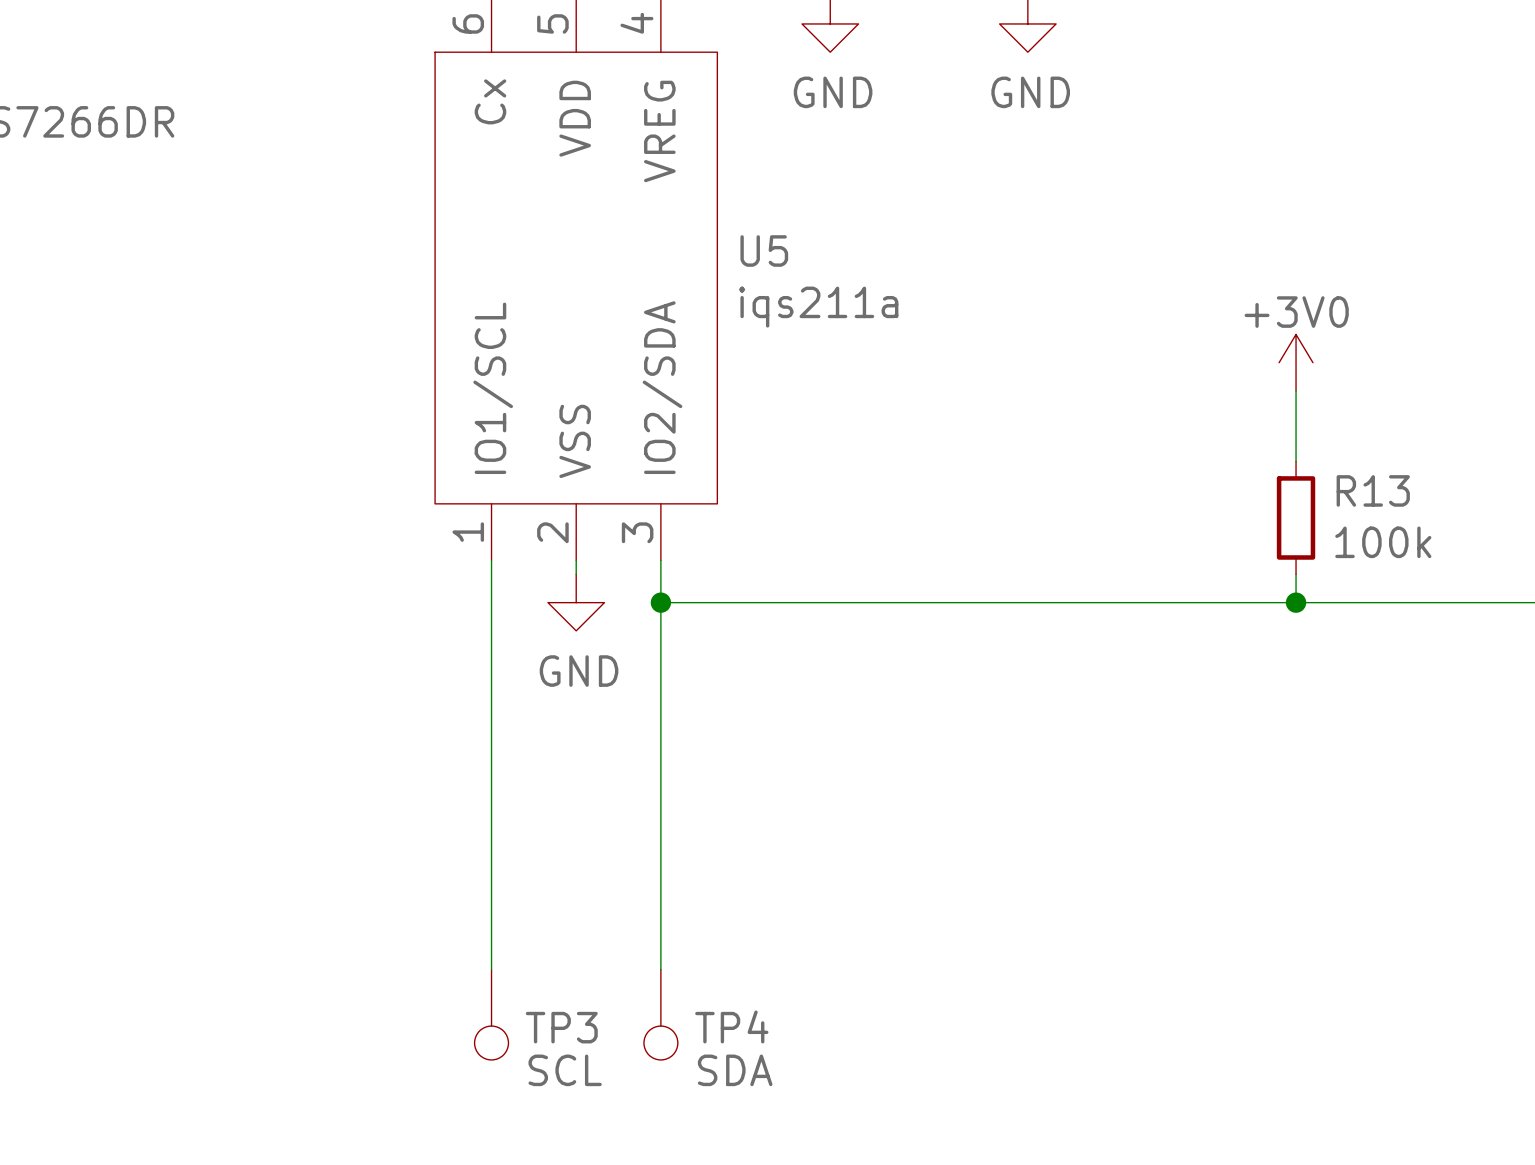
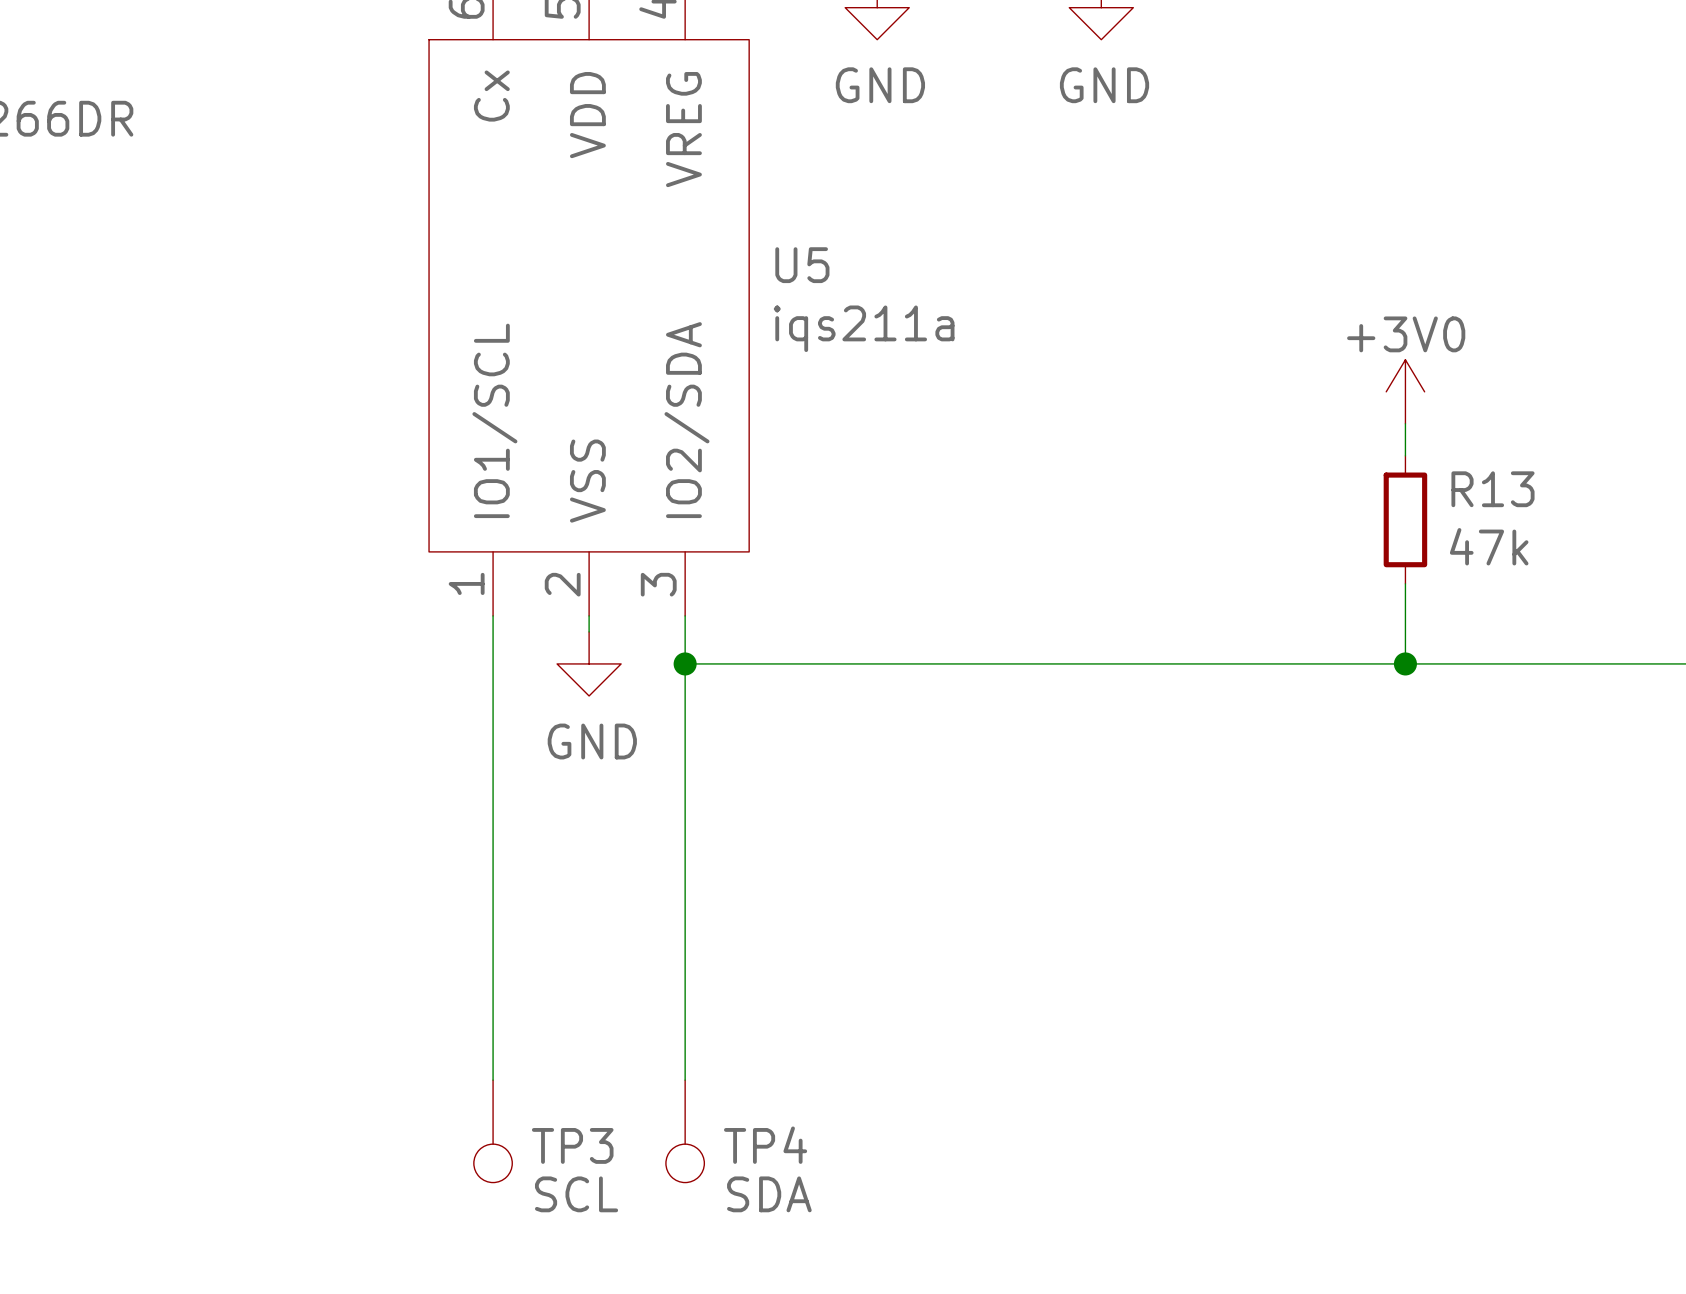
wire: (1296, 419) (1296, 461) -> (1405, 583) (1405, 631)
R13 position: (1296, 517) -> (1405, 519)
R13 value: 100k (1383, 542) -> 47k (1489, 546)

